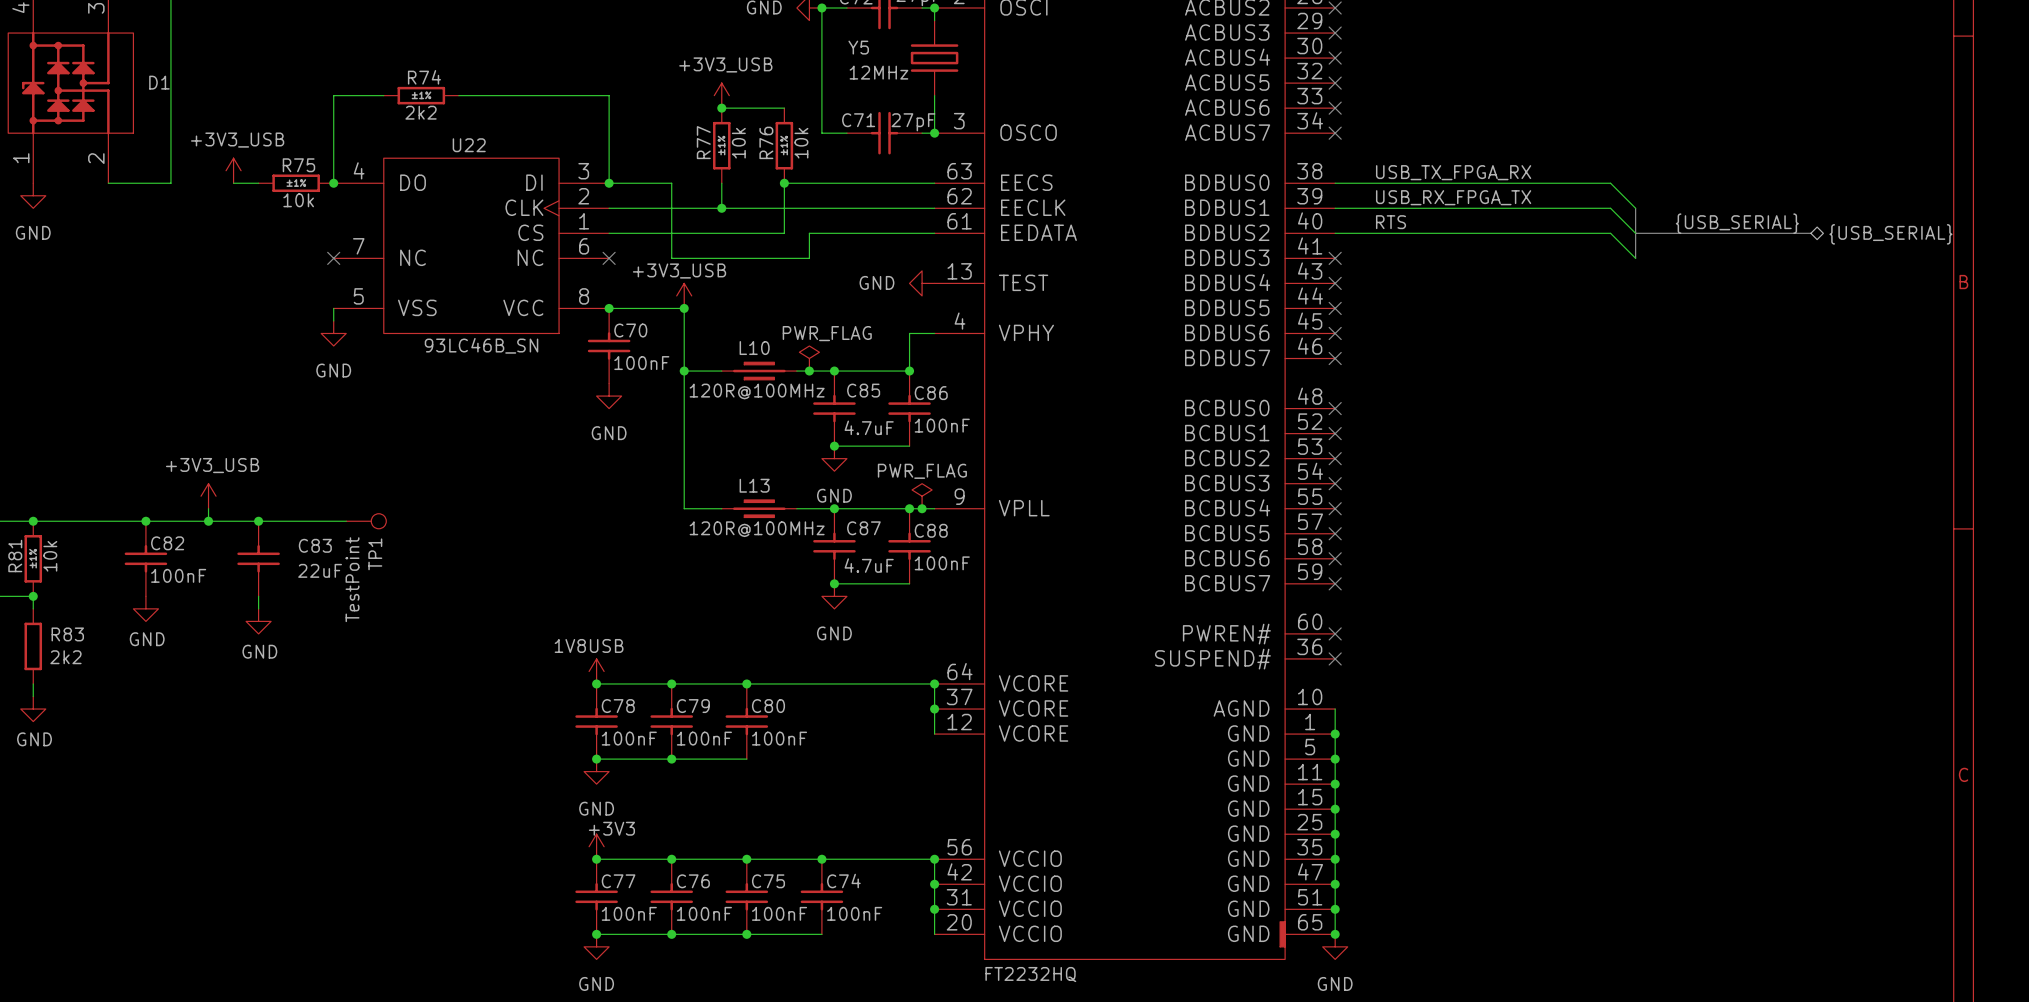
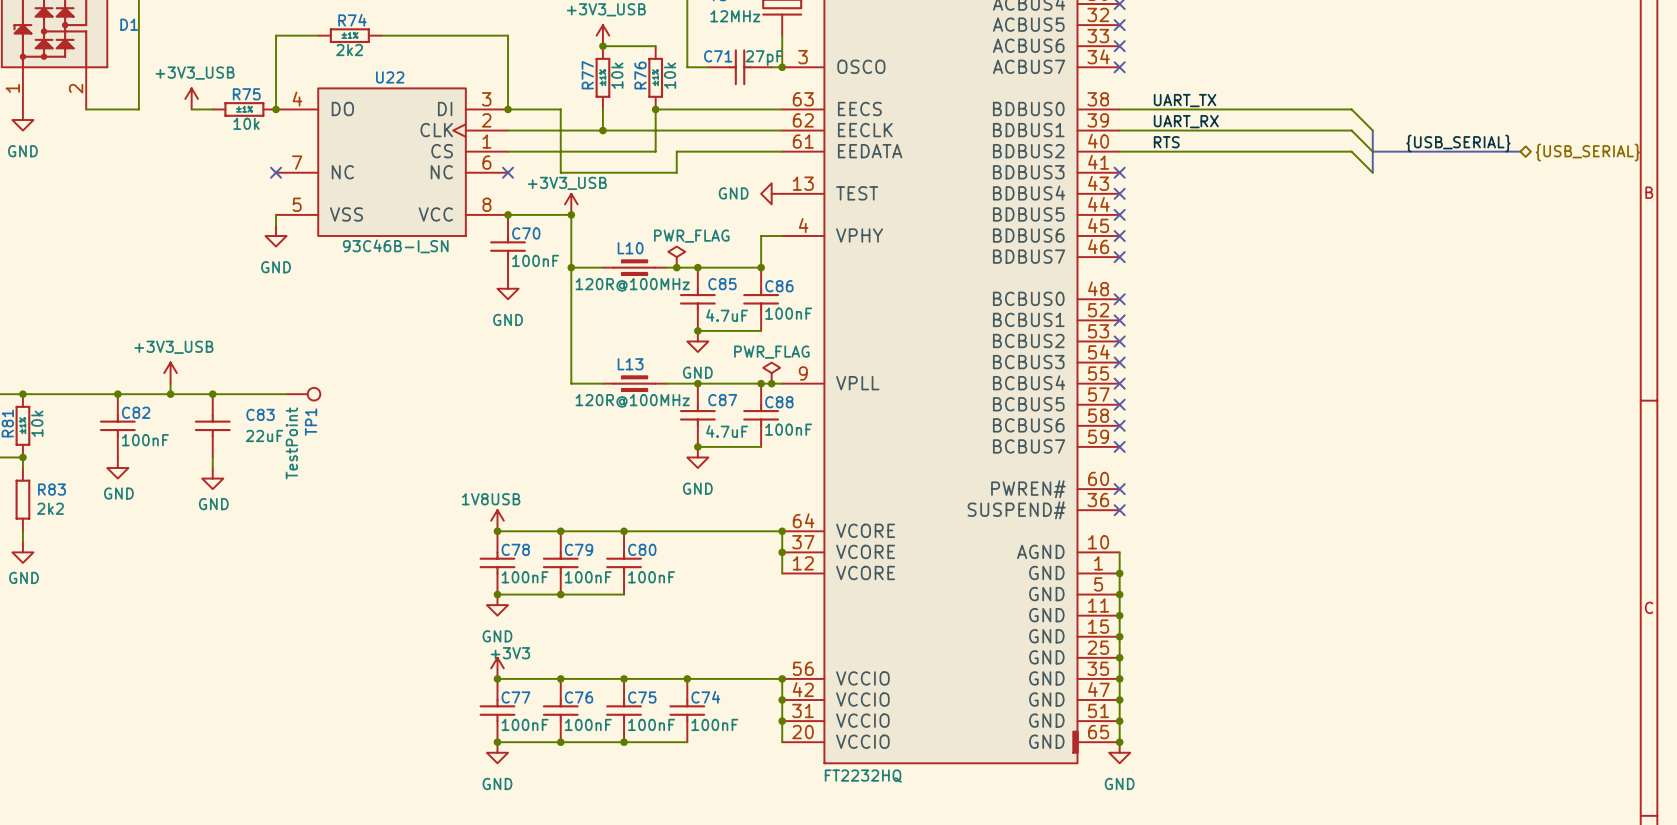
label: USB_TX_FPGA_RX (1453, 172) -> UART_TX (1185, 100)
label: USB_RX_FPGA_TX (1453, 197) -> UART_RX (1186, 121)
U22 value: 93LC46B_SN (481, 345) -> 93C46B-I_SN (395, 246)

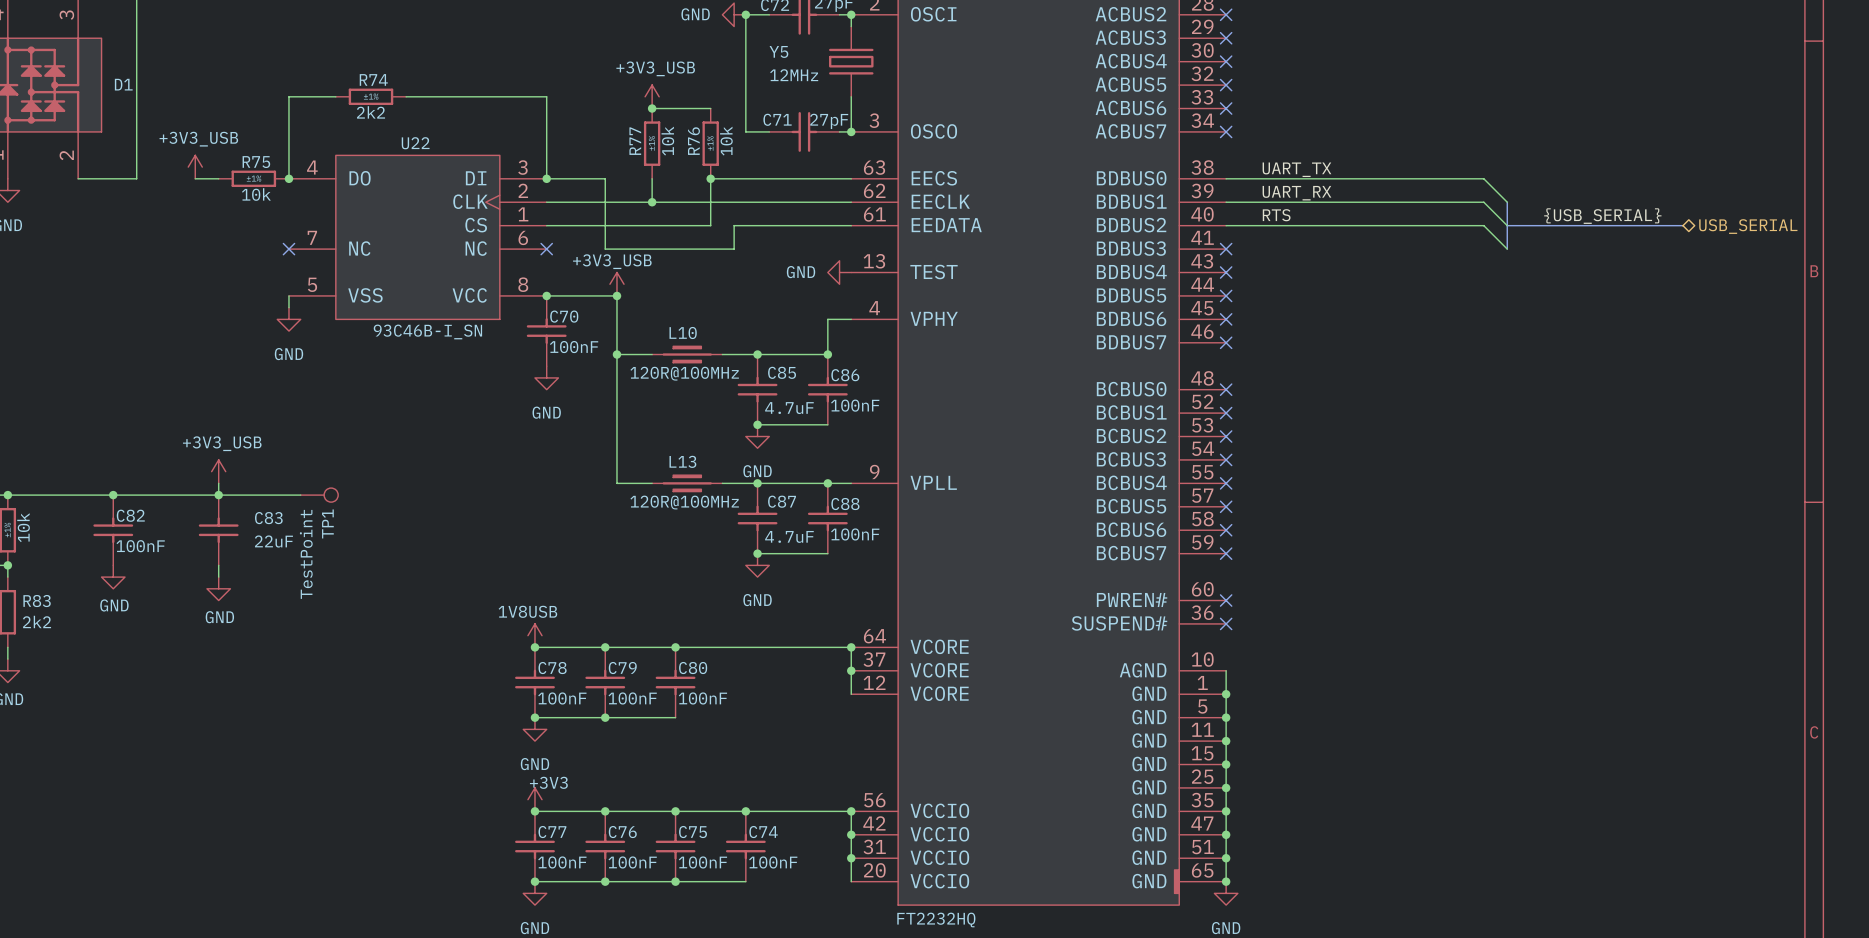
bus: none -> (1671, 225) (1682, 225)
hierarchical label: {USB_SERIAL} (1587, 152) -> USB_SERIAL (1748, 226)
power symbol: PWR_FLAG (676, 257) -> none
junction: (676, 267) -> none
power symbol position: +3V3_USB (170, 373) -> +3V3_USB (218, 471)
power symbol: PWR_FLAG (771, 373) -> none
wire: (170, 383) (170, 394) -> (218, 483) (218, 495)
junction: (771, 383) -> none
junction: (170, 394) -> none

